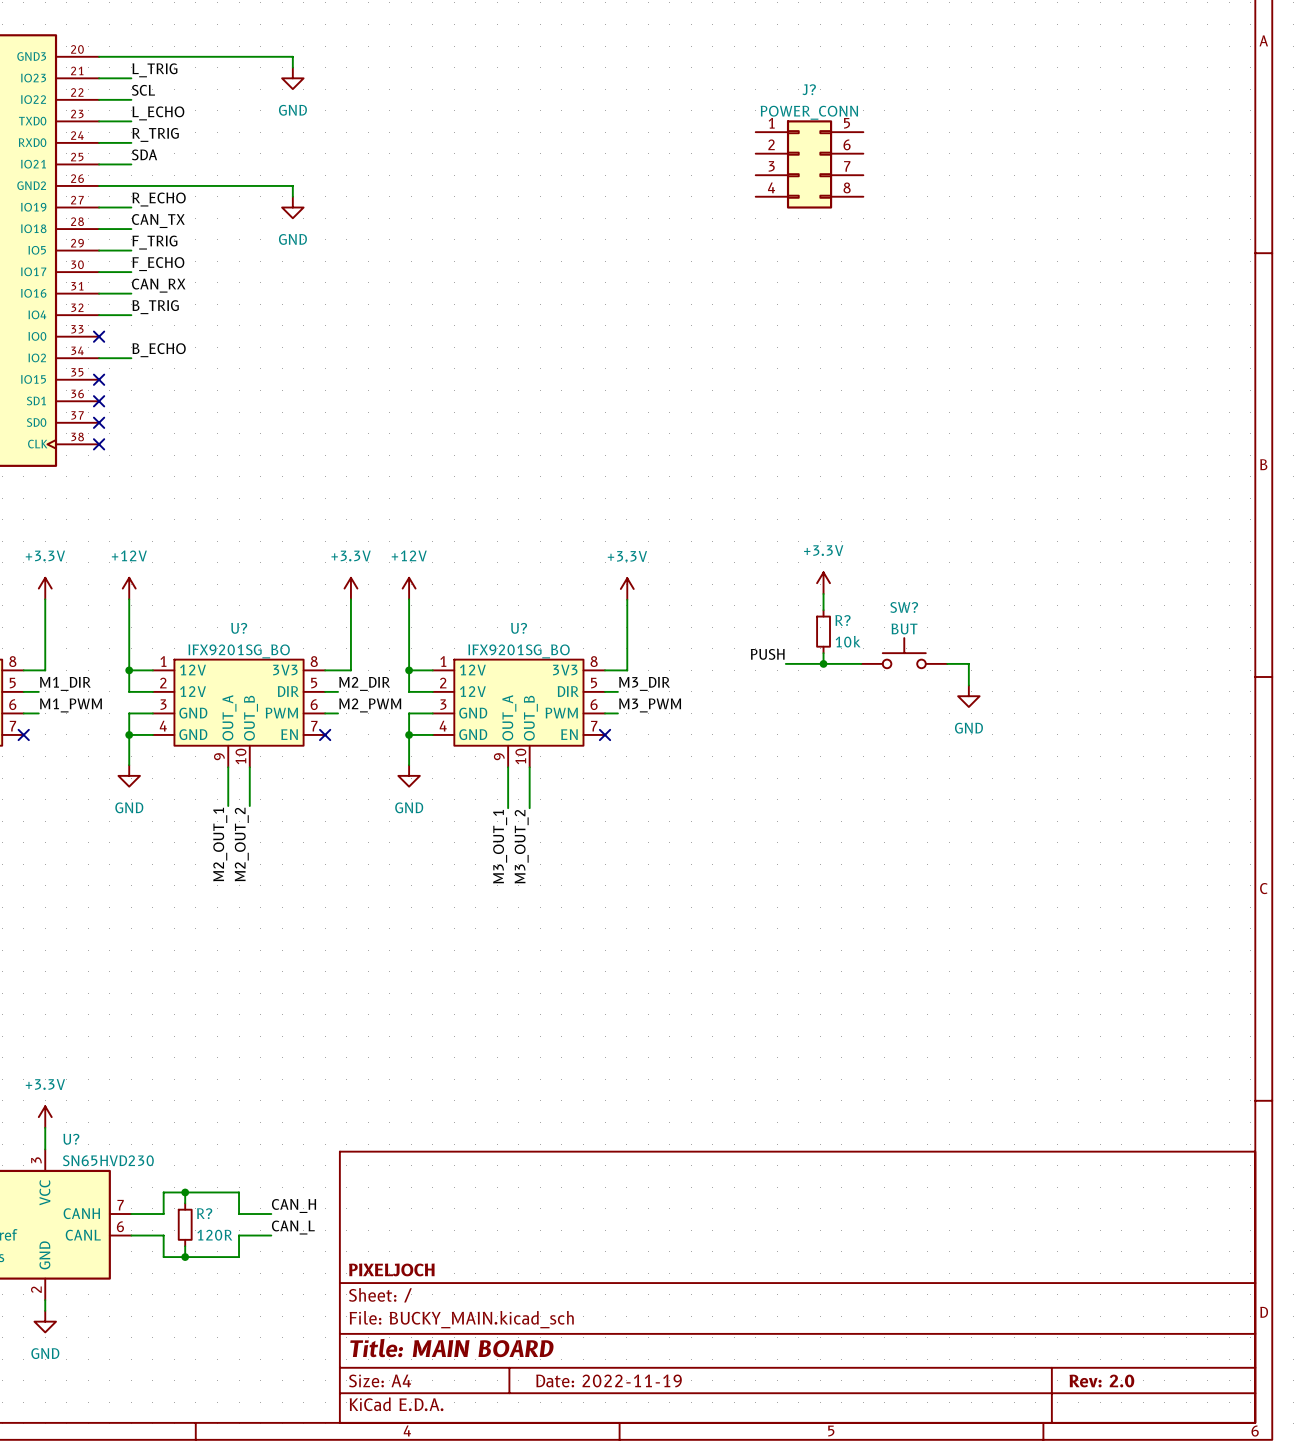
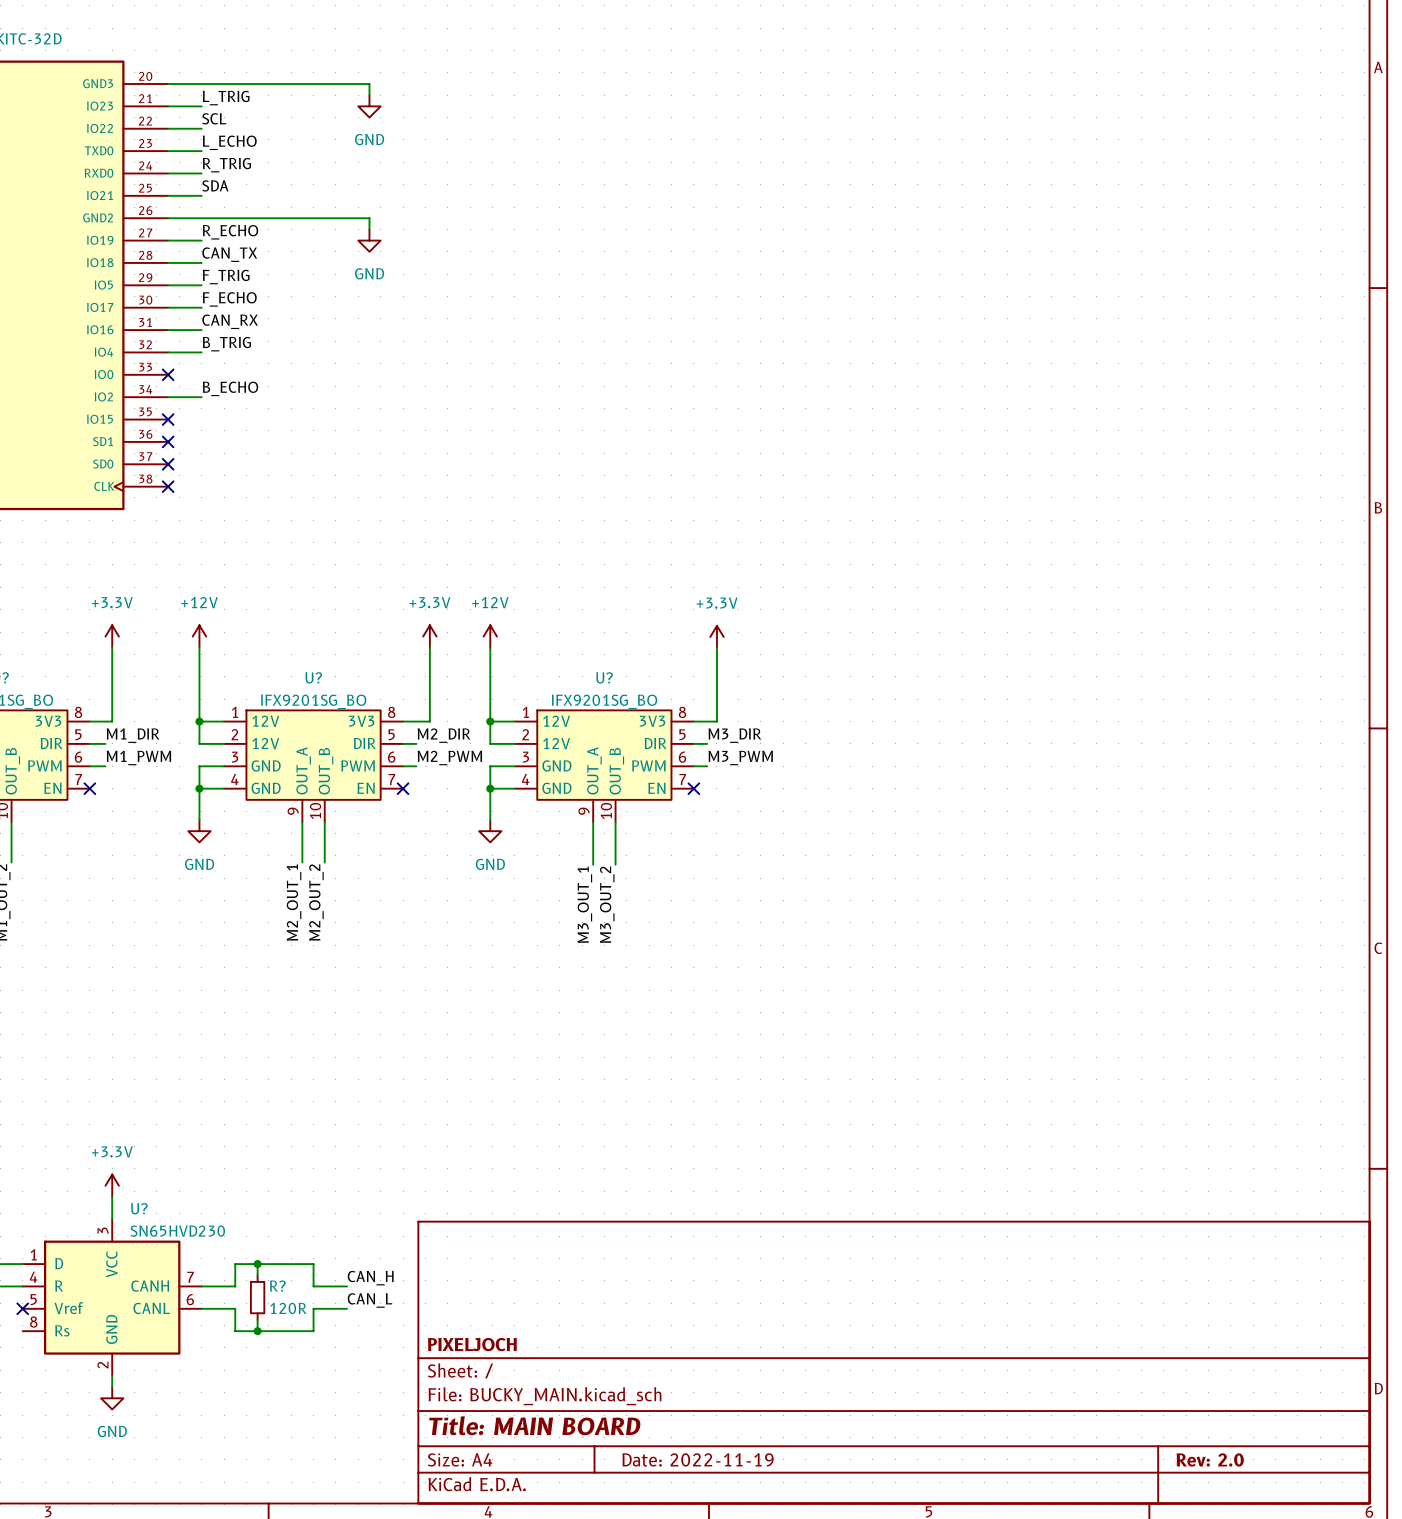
J?: POWER_CONN (809, 164) -> none
power symbol: +3.3V (823, 583) -> none
wire: (823, 593) (823, 610) -> none
R?: 10k (823, 631) -> none
wire: (823, 653) (823, 663) -> none
SW?: BUT (904, 653) -> none
label: PUSH (767, 654) -> none
wire: (785, 663) (861, 663) -> none
junction: (823, 663) -> none
wire: (947, 663) (968, 663) (968, 685) -> none
power symbol: GND (968, 696) -> none

